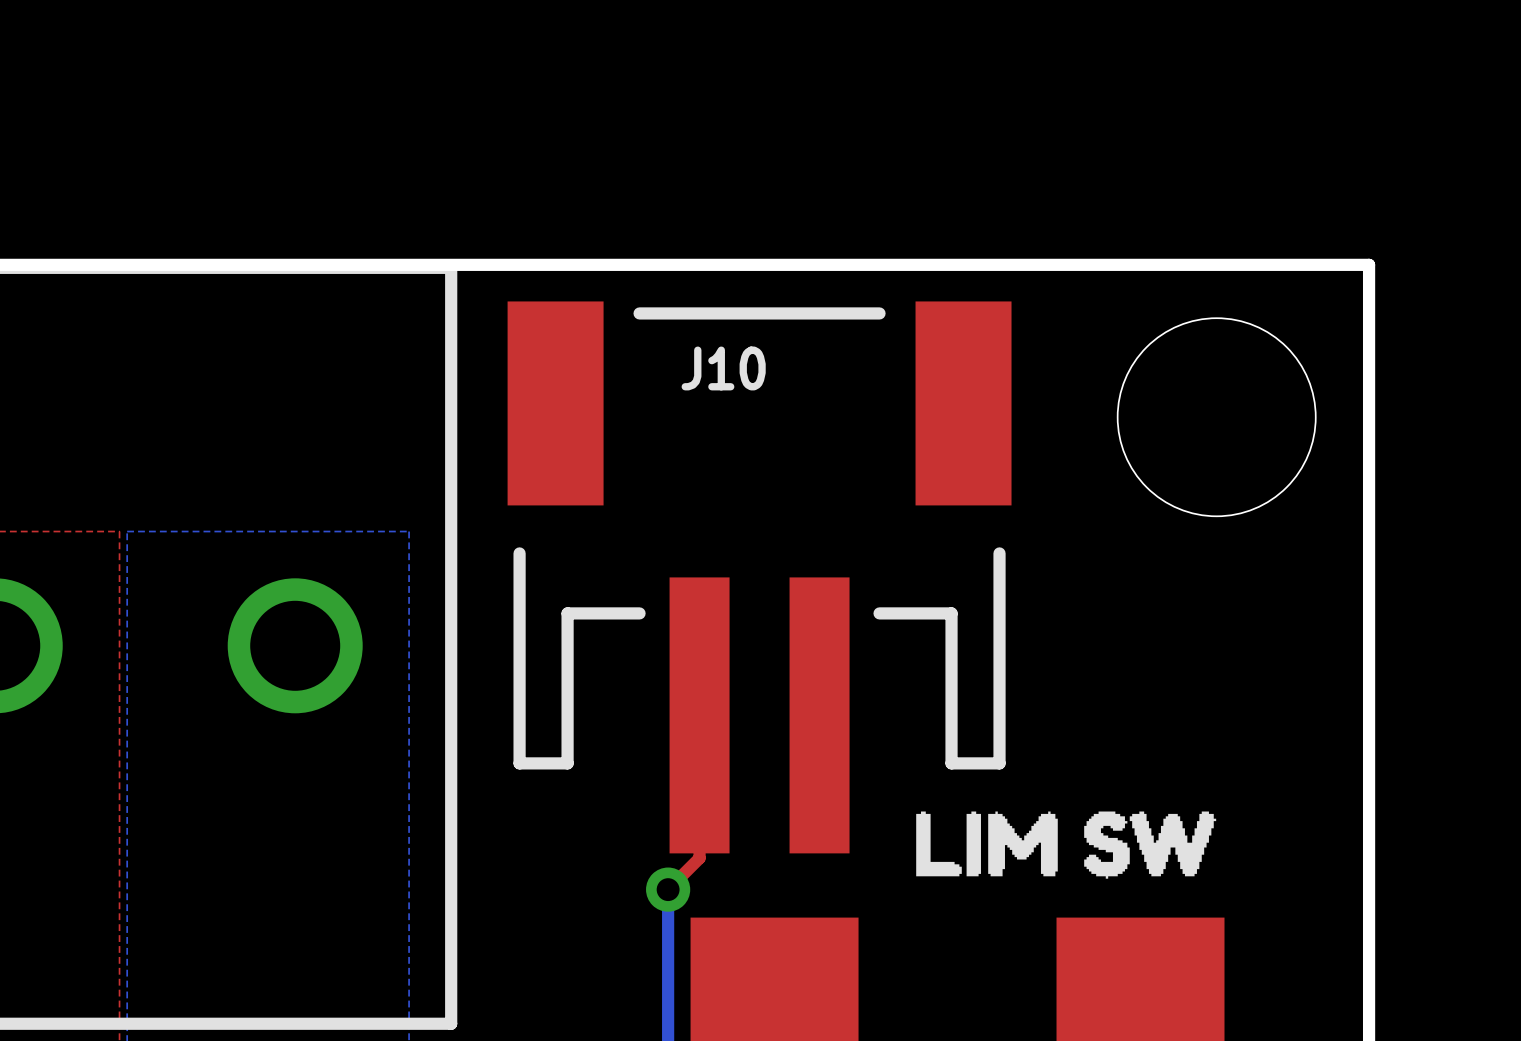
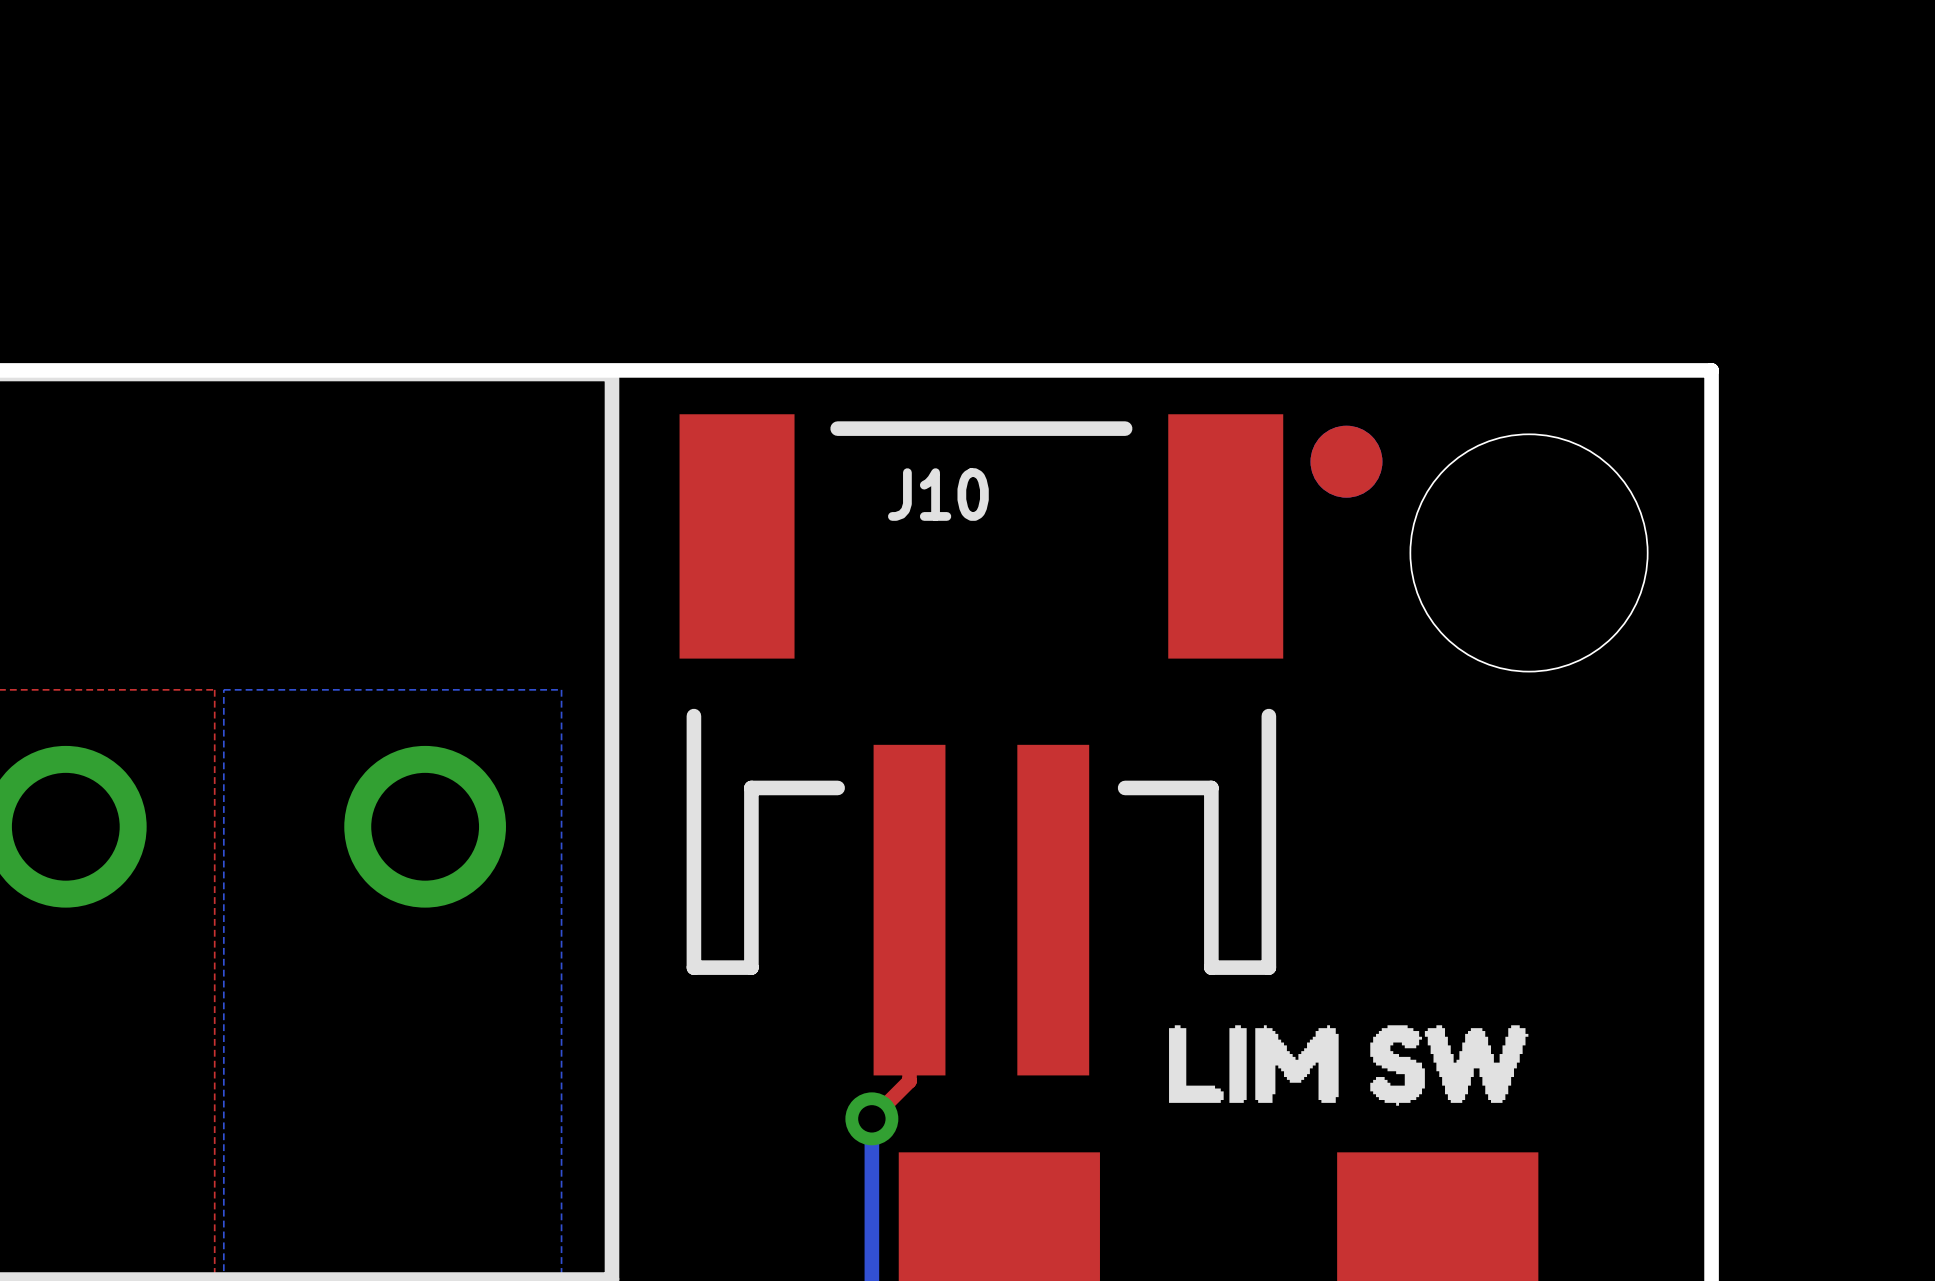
part: none -> (1346, 461)

